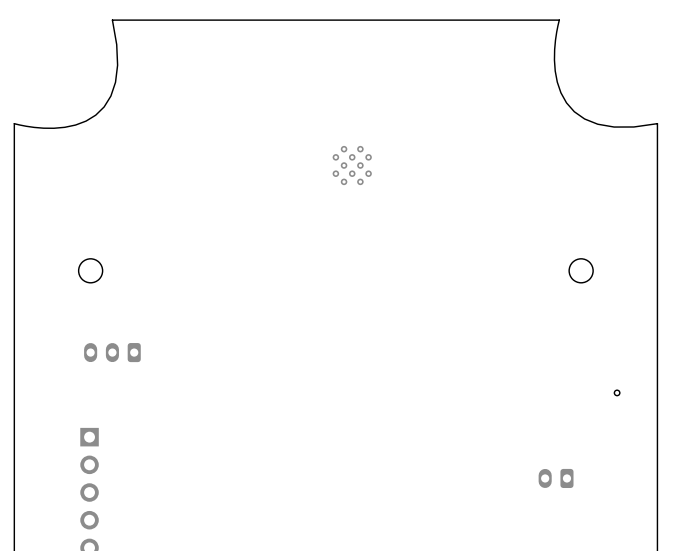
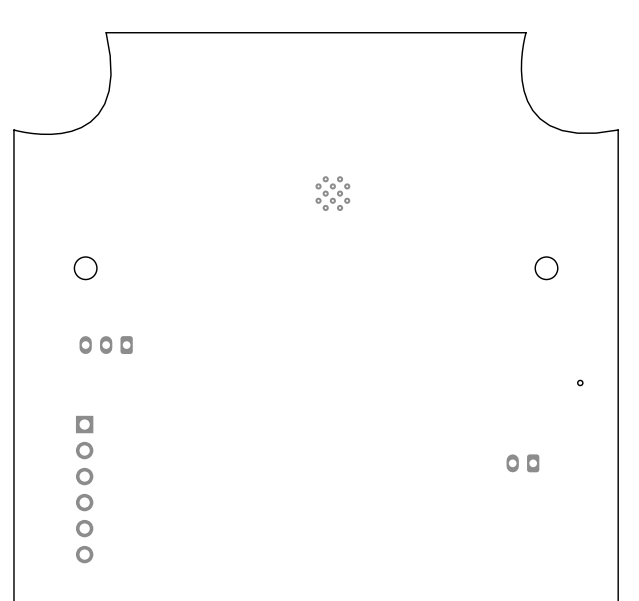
part: (352, 165) -> none
part: none -> (332, 193)

